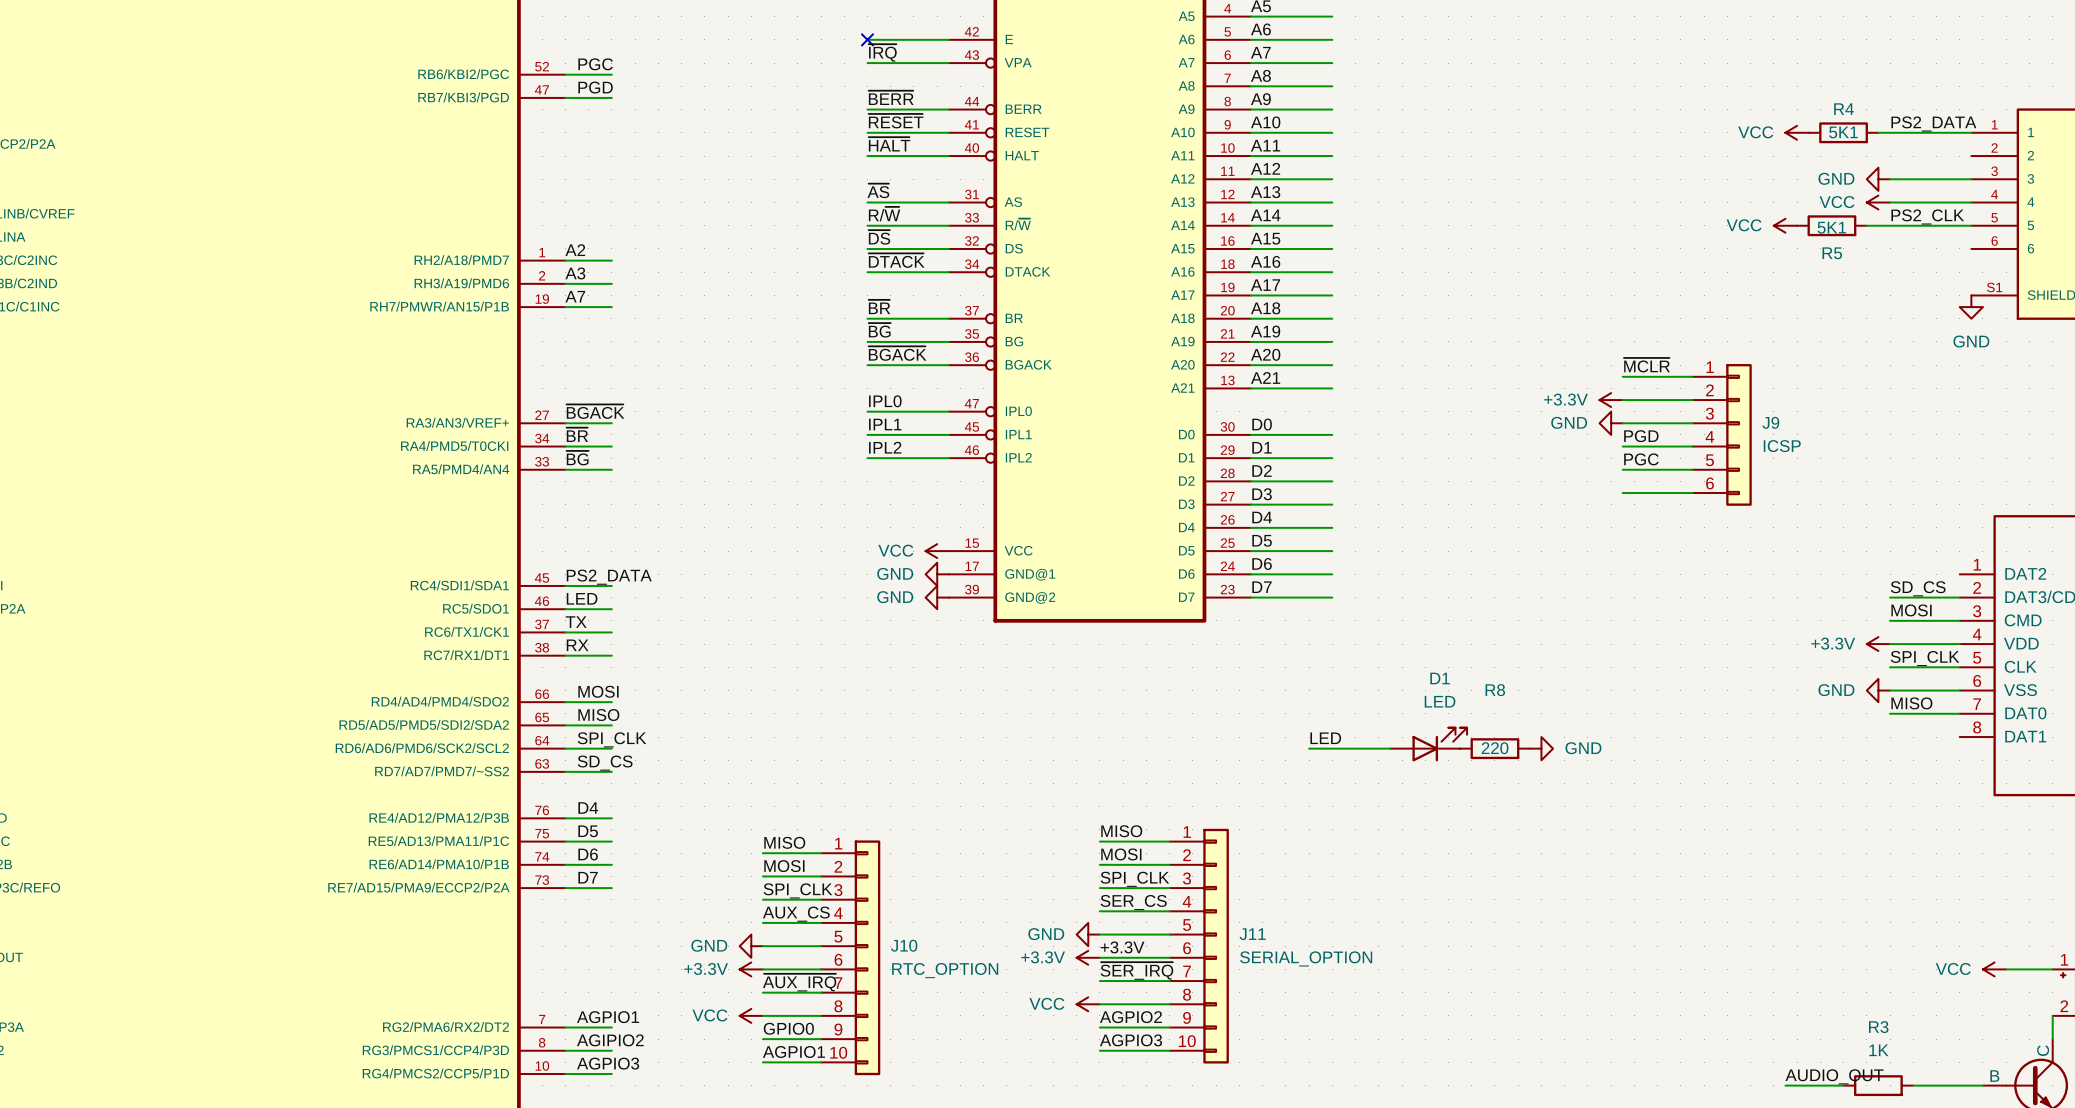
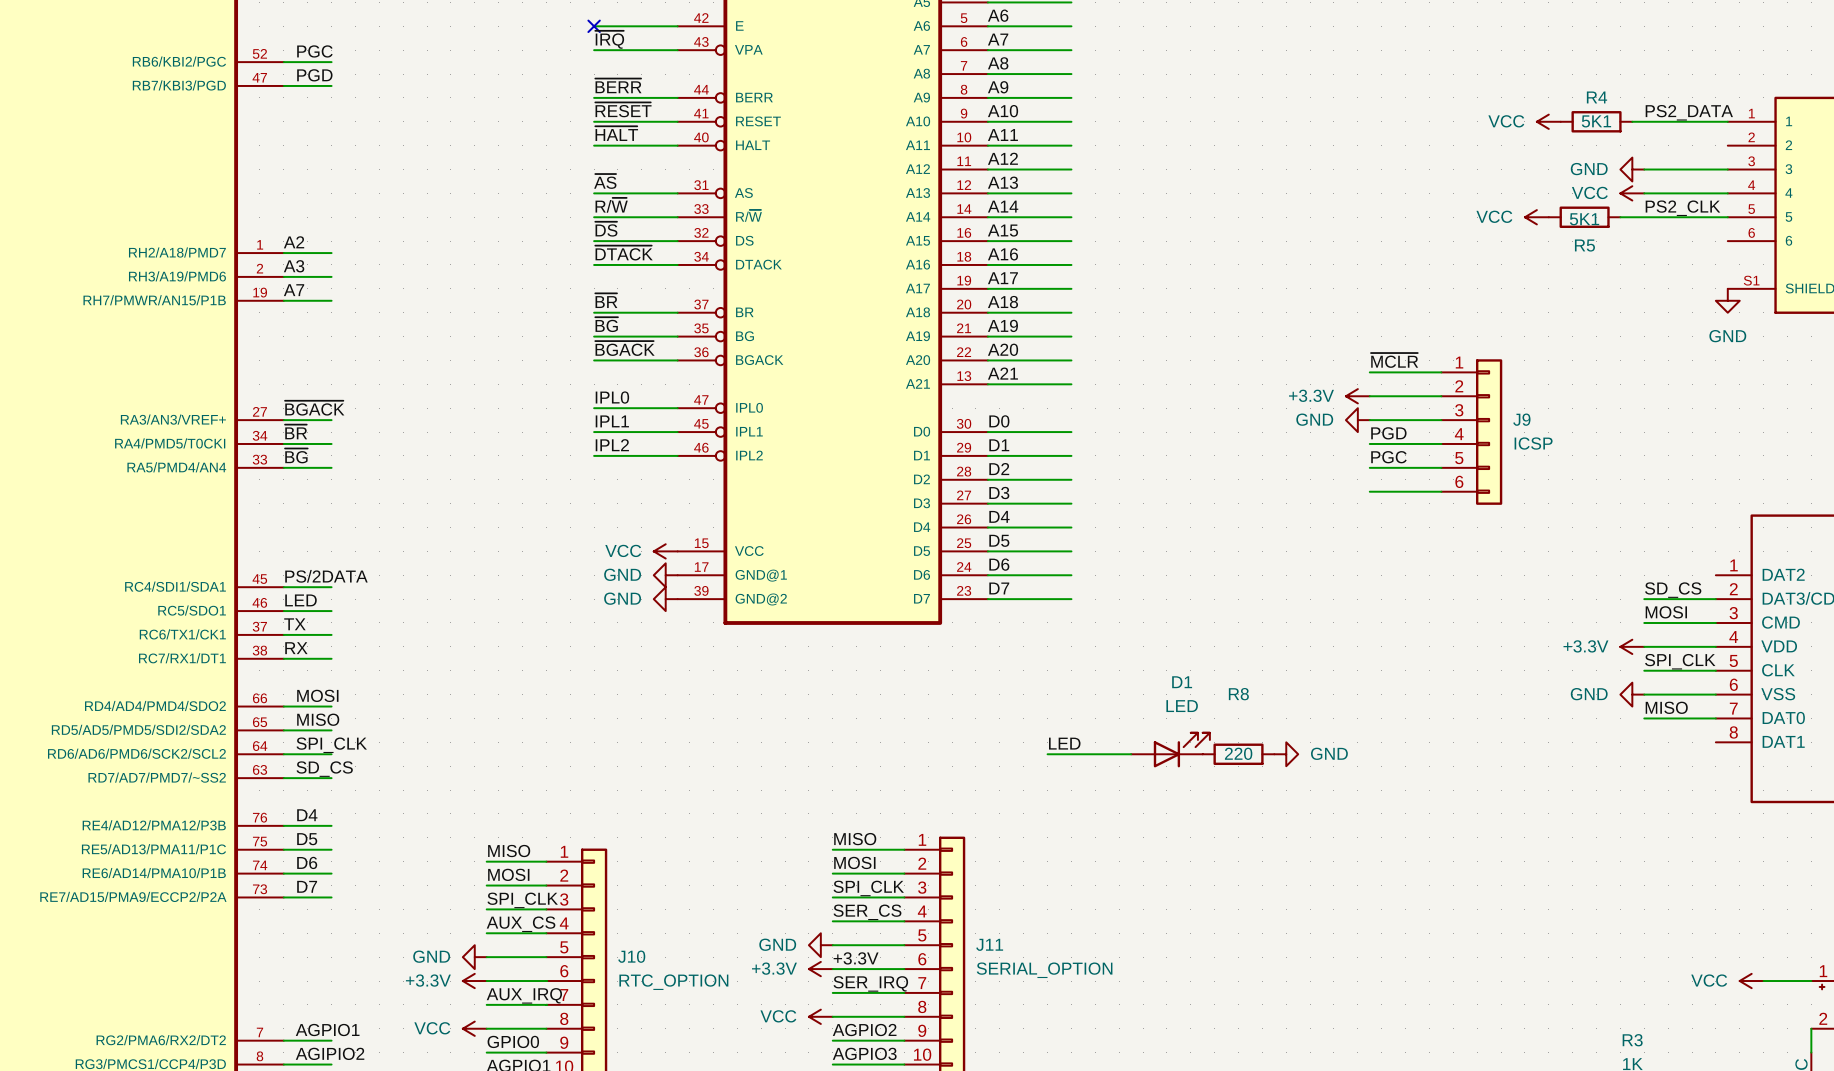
label: PS2_DATA (609, 577) -> PS/2DATA (326, 576)
label: ~{SER_IRQ} (1136, 971) -> SER_IRQ (870, 983)
label: ~{AUX_IRQ} (799, 982) -> AUX_IRQ (524, 995)

